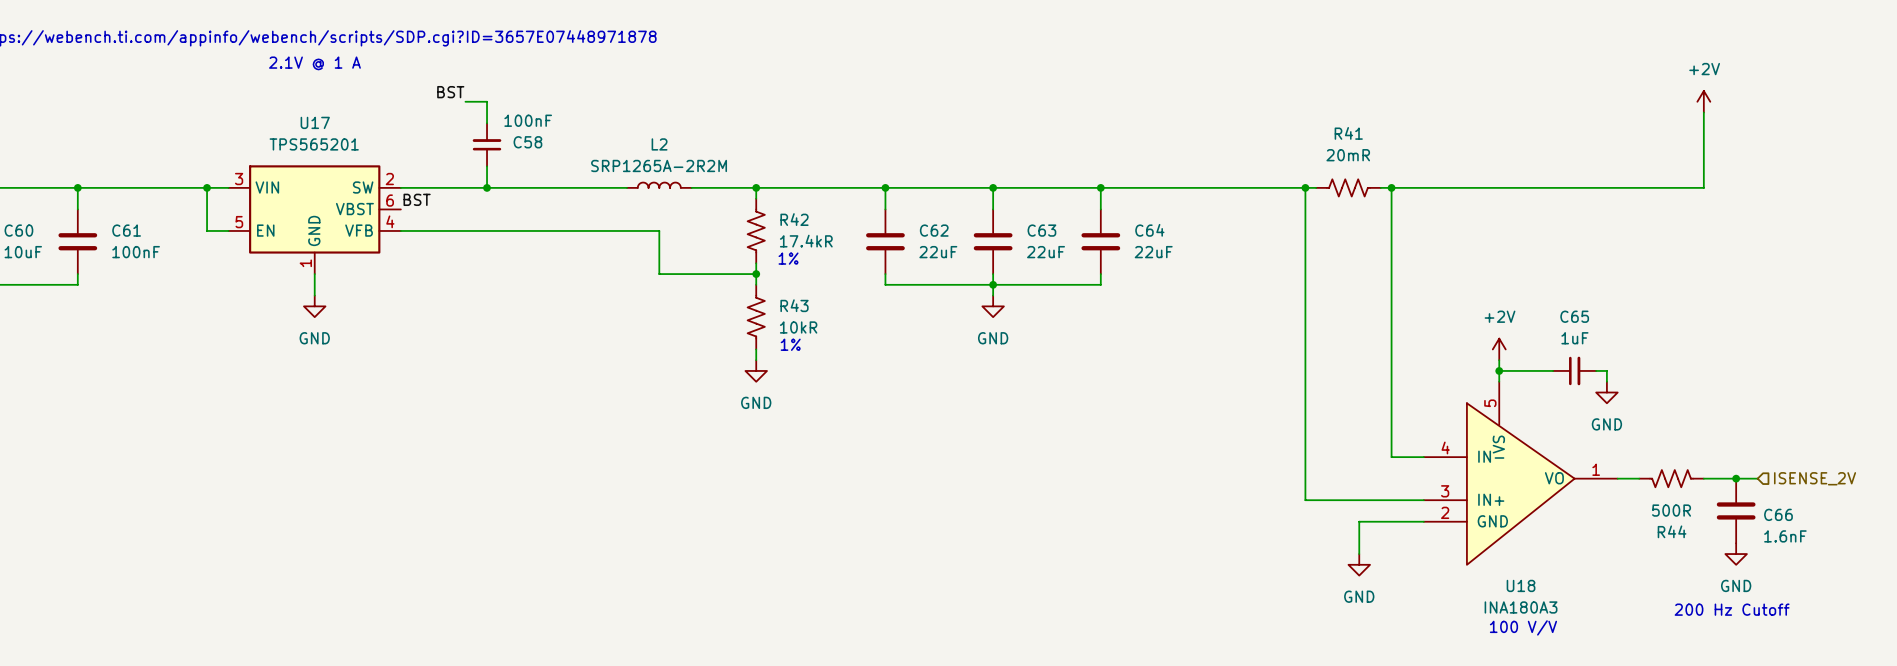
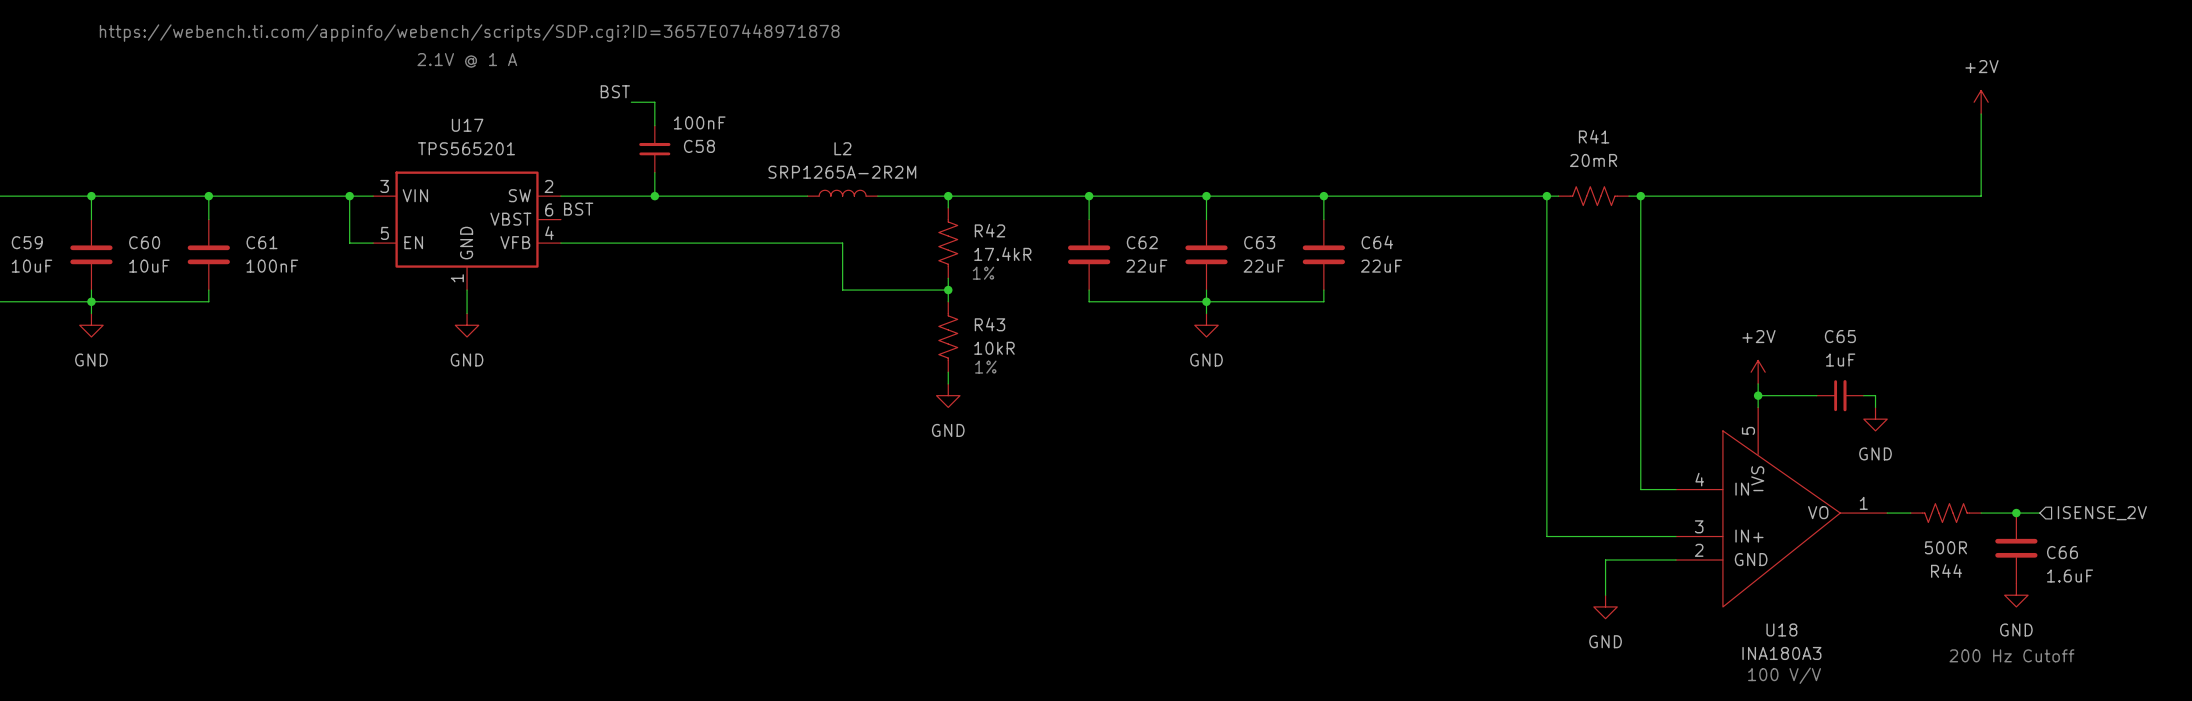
C66 value: 1.6nF (1785, 536) -> 1.6uF (2070, 575)

